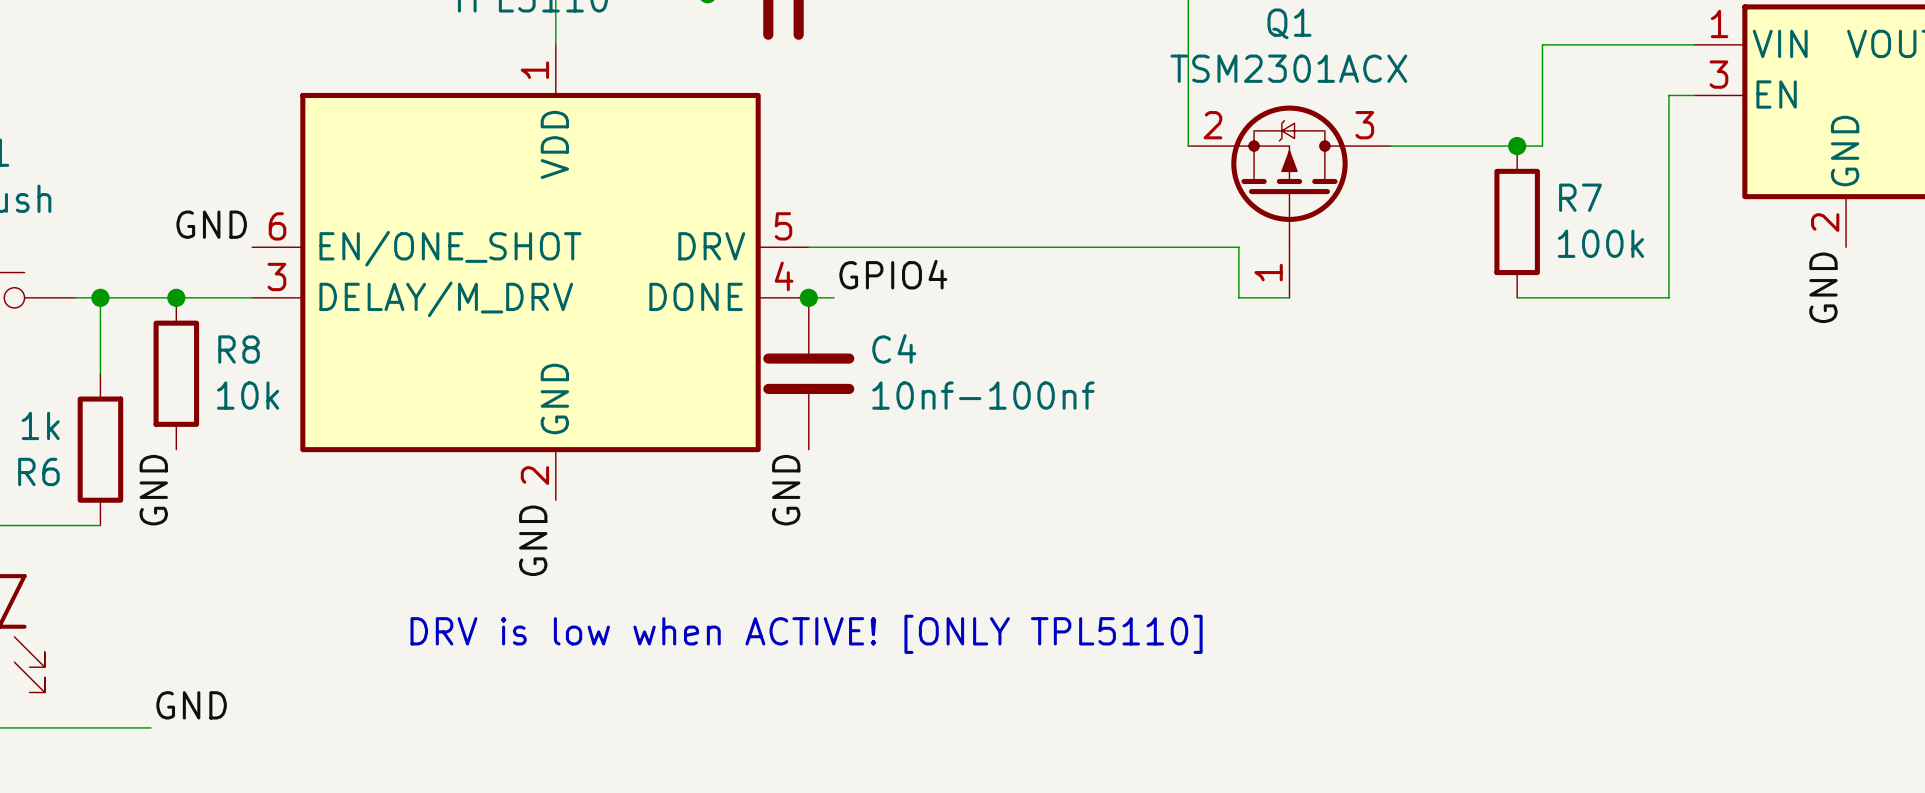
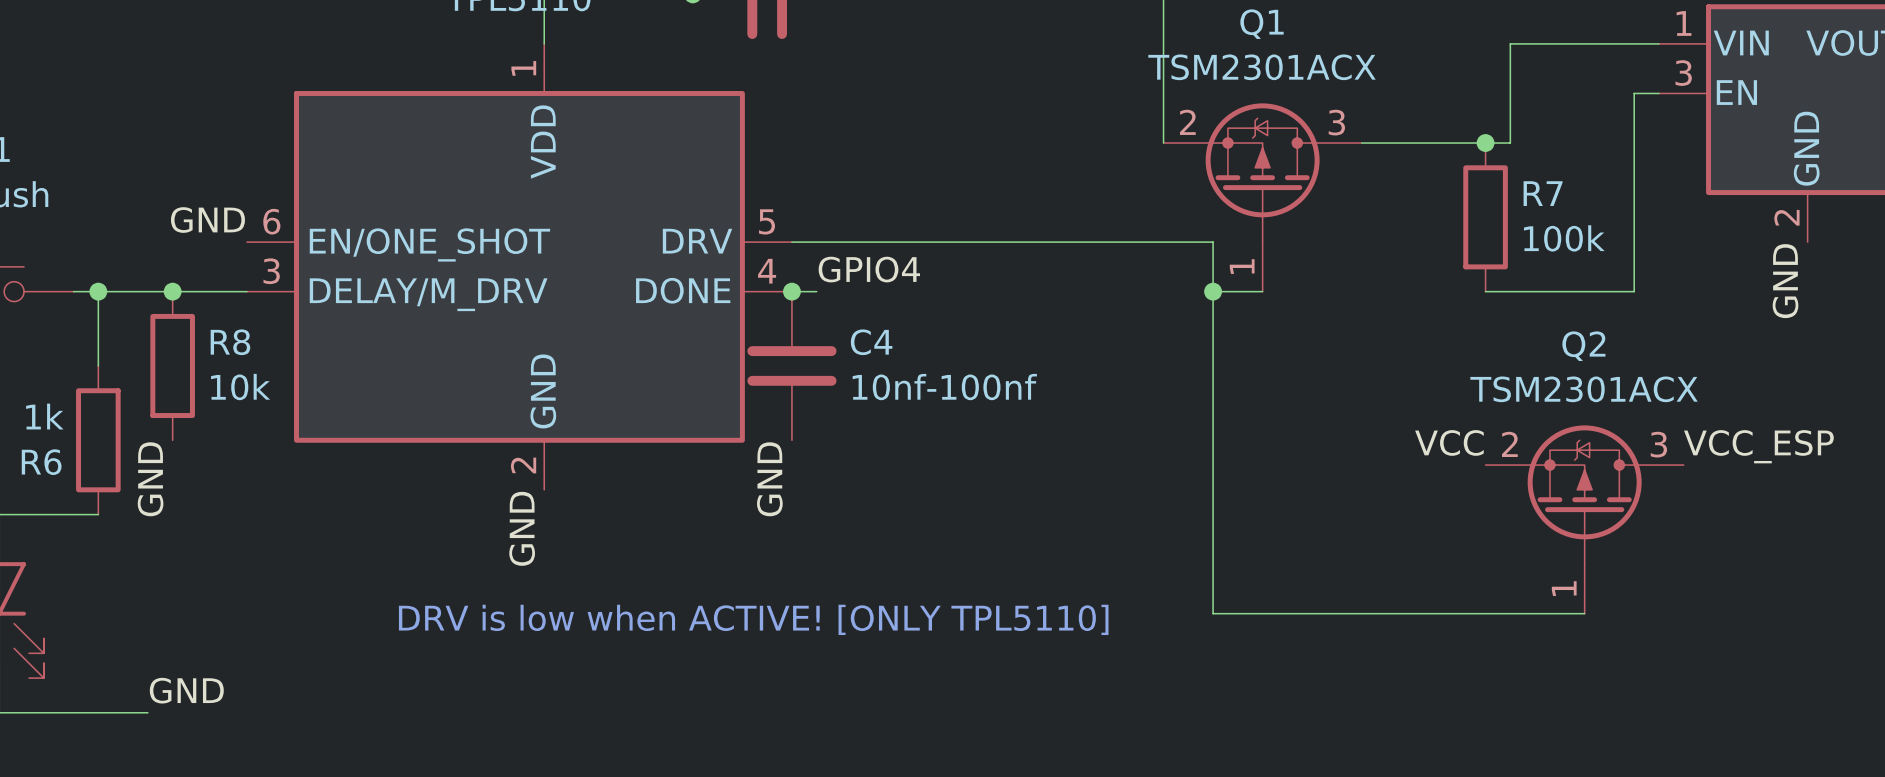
wire: none -> (1213, 291) (1213, 613) (1584, 613)
junction: none -> (1213, 291)
label: none -> VCC (1449, 442)
label: none -> VCC_ESP (1758, 446)
Q2: none -> TSM2301ACX (1584, 519)

